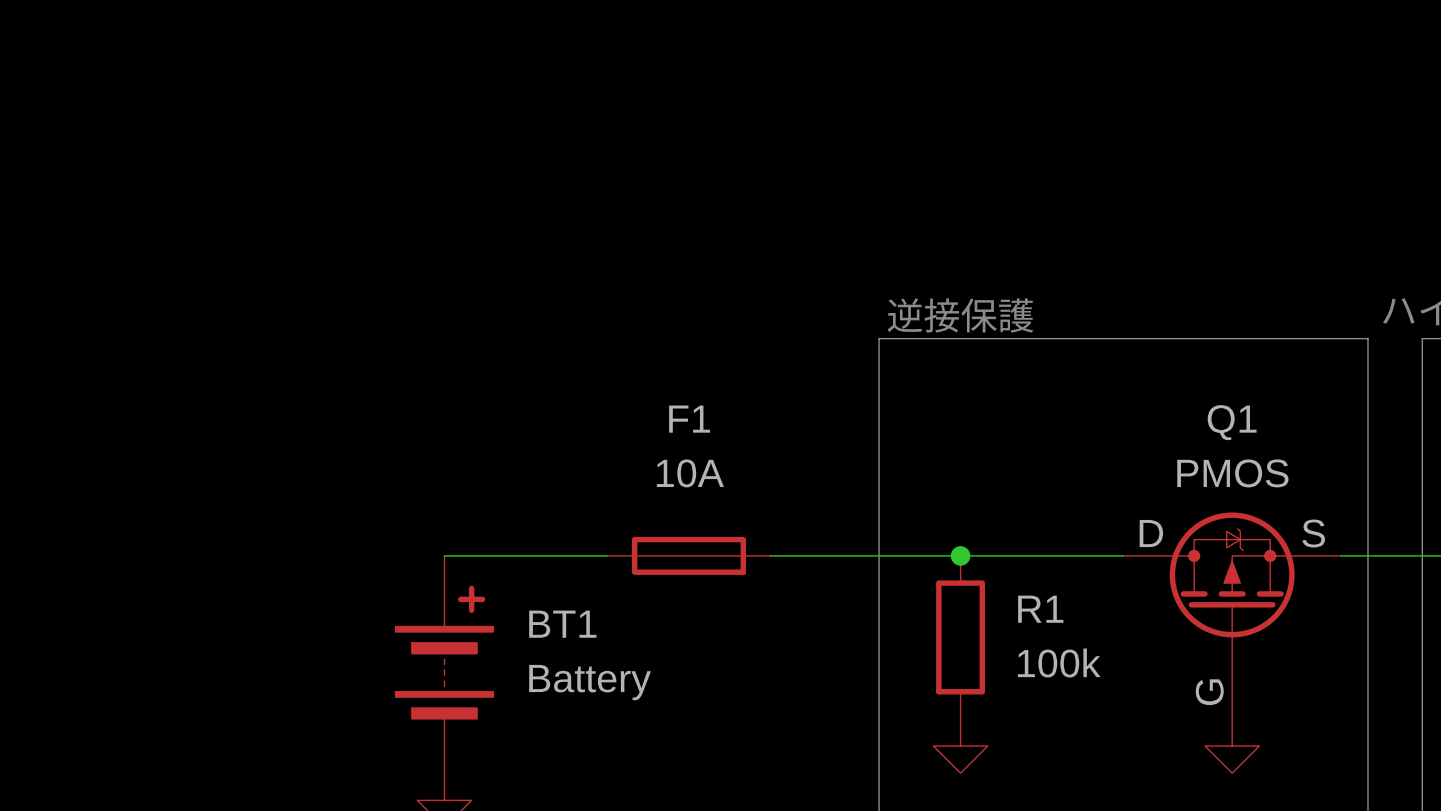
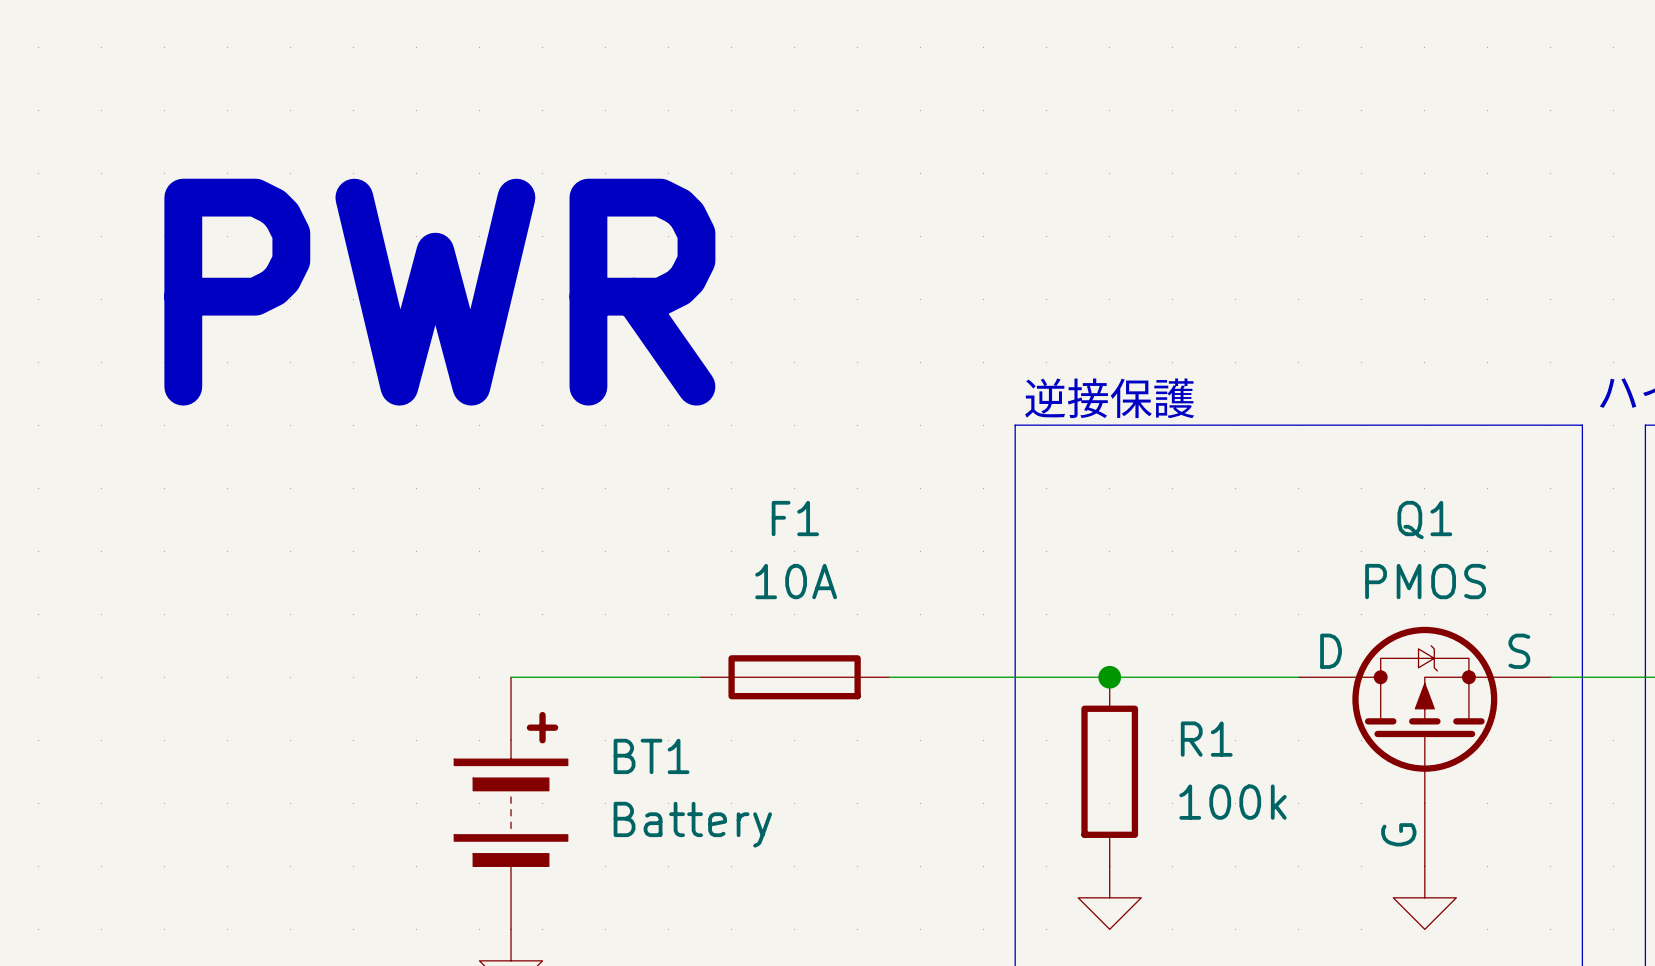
text: none -> PWR (439, 292)

